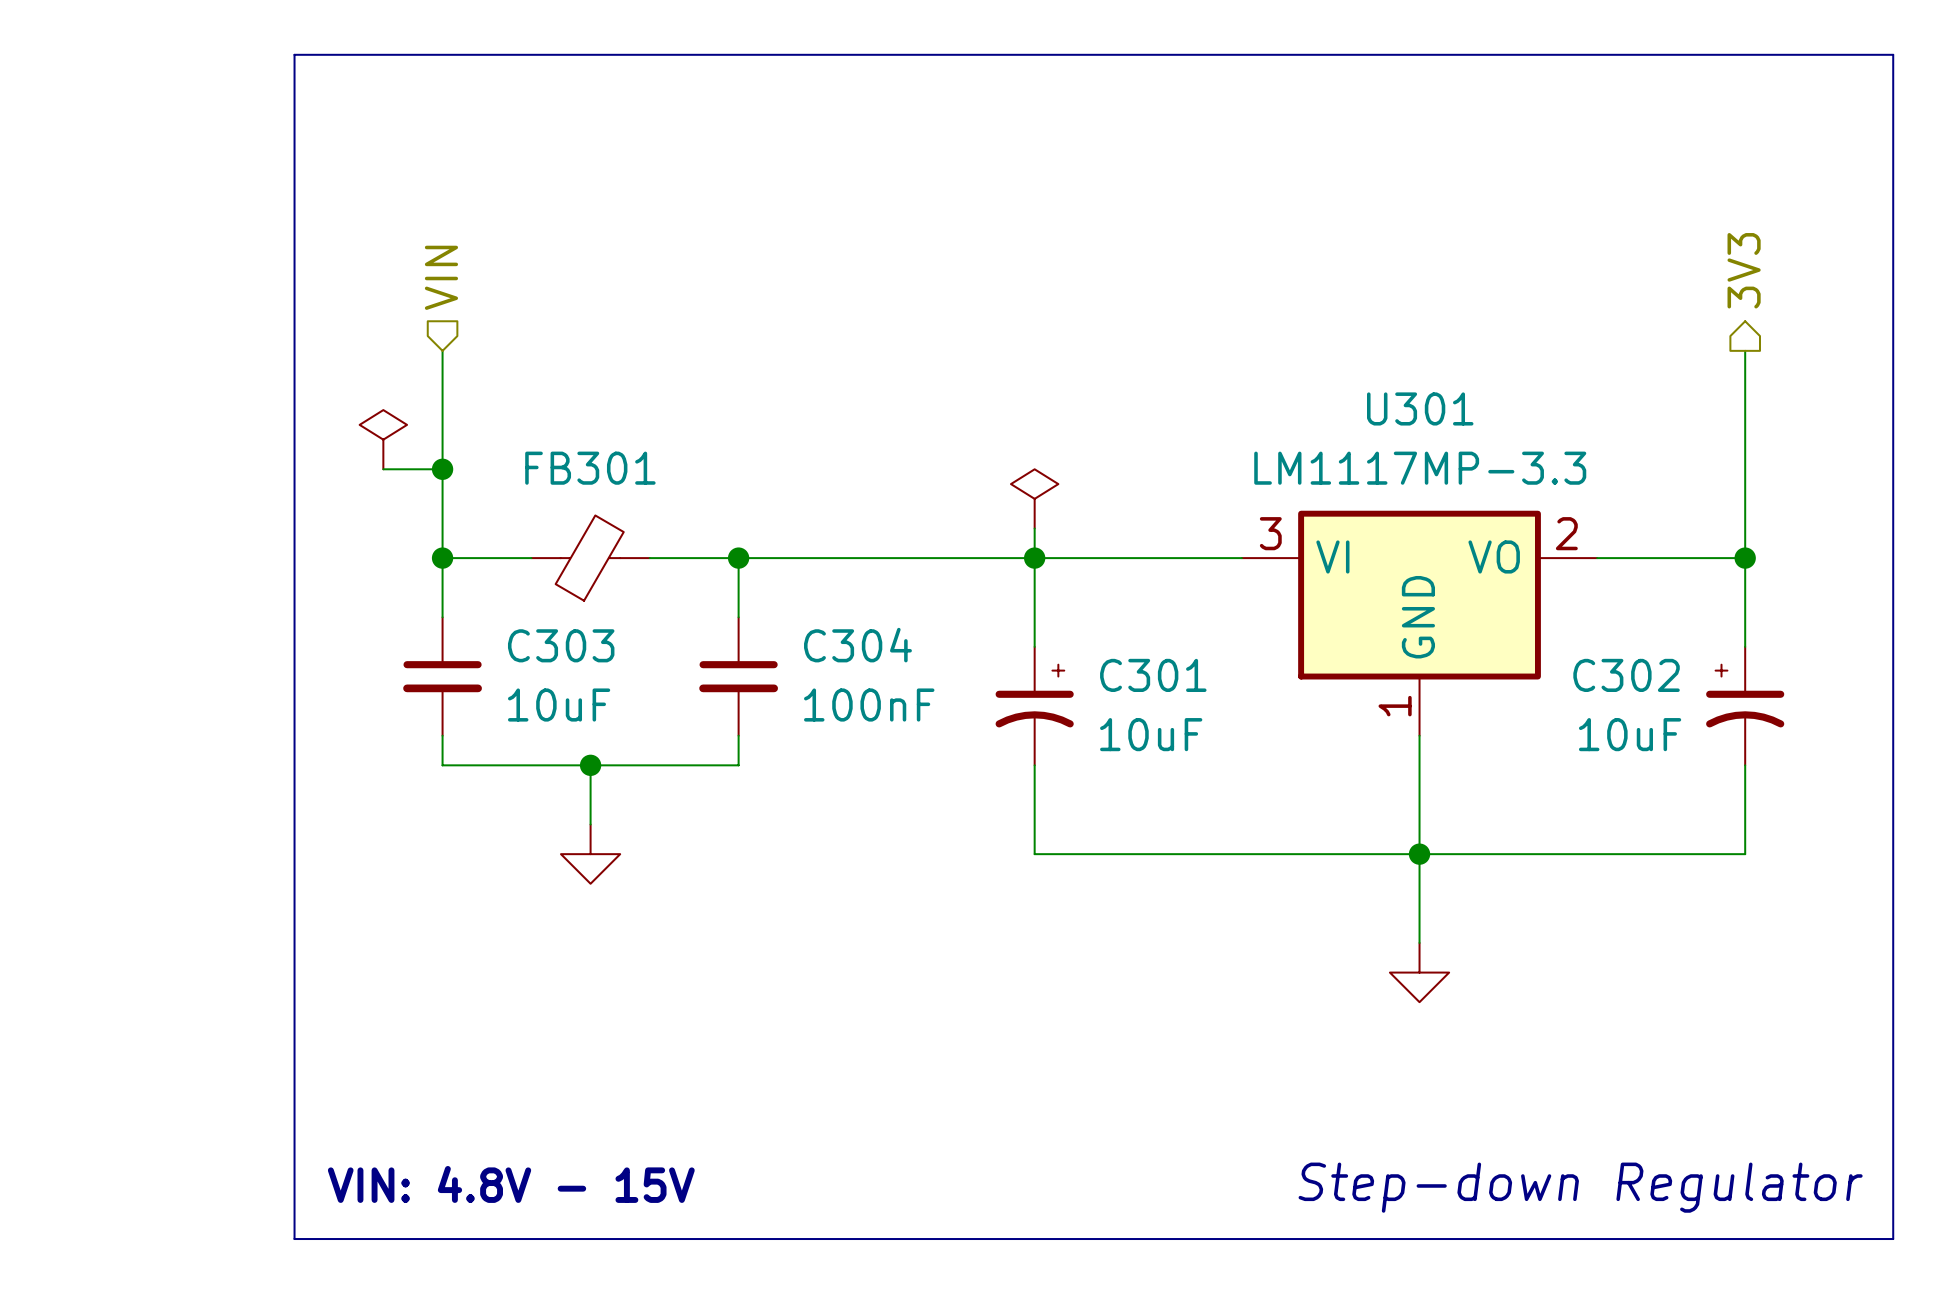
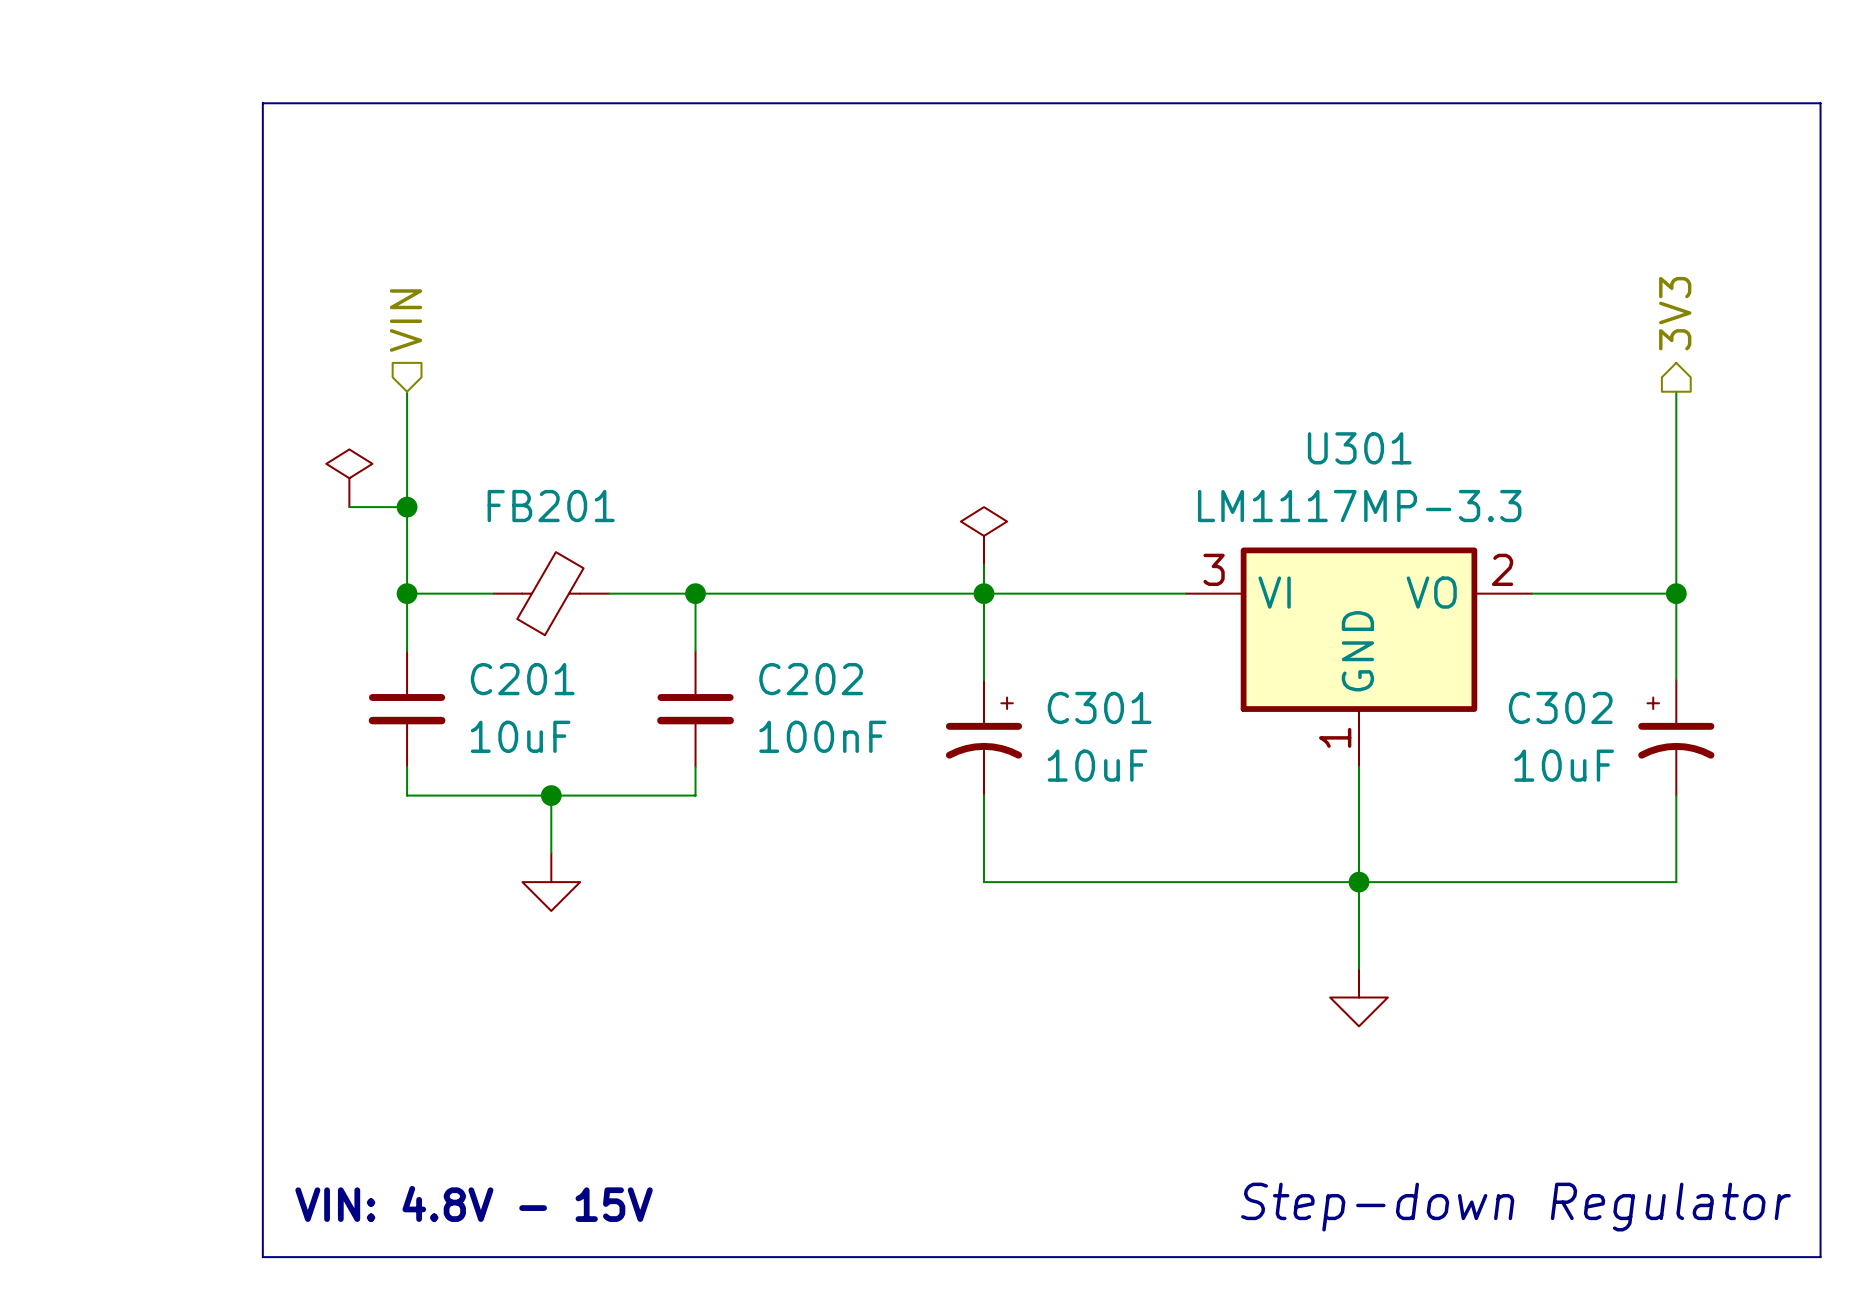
FB301 name: FB301 (590, 468) -> FB201 (551, 506)
C303 name: C303 (561, 645) -> C201 (522, 679)
C304 name: C304 (857, 645) -> C202 (811, 679)

